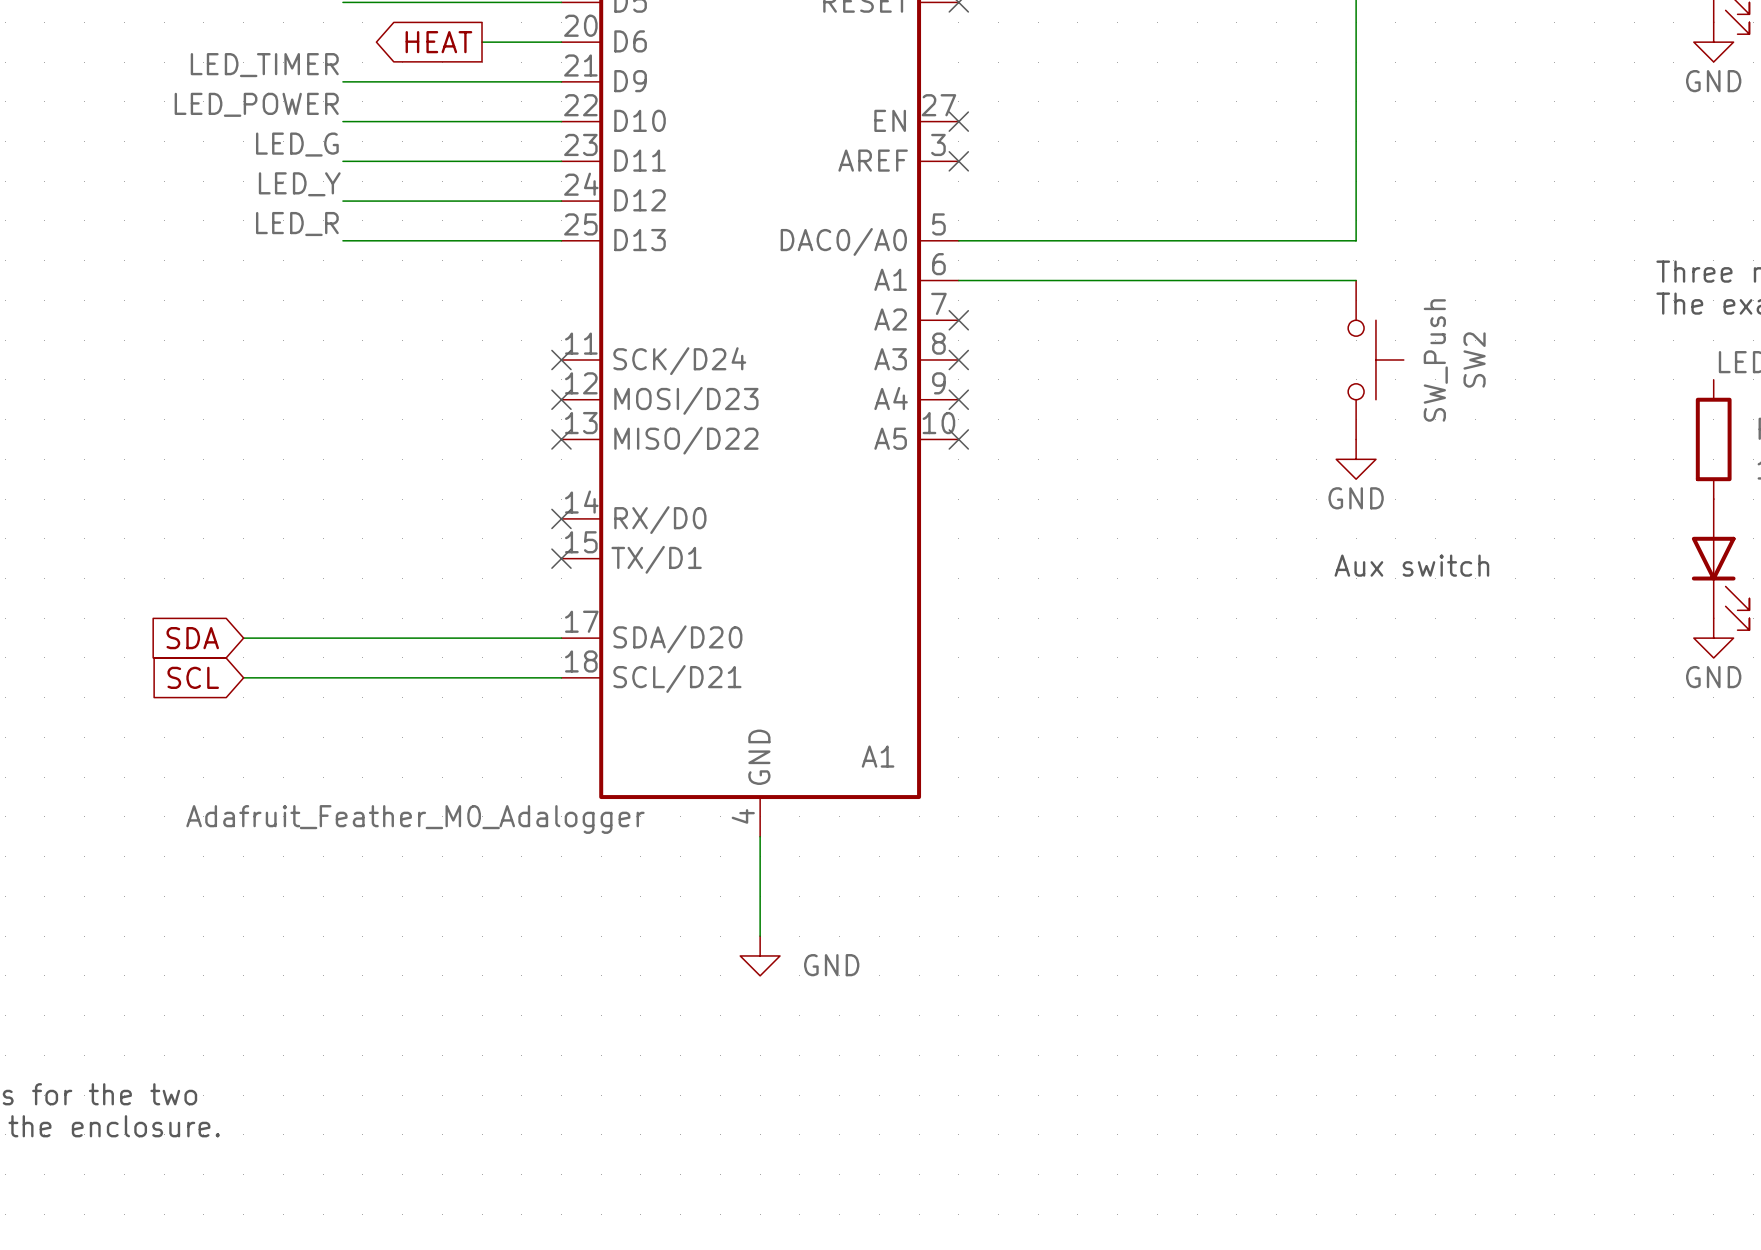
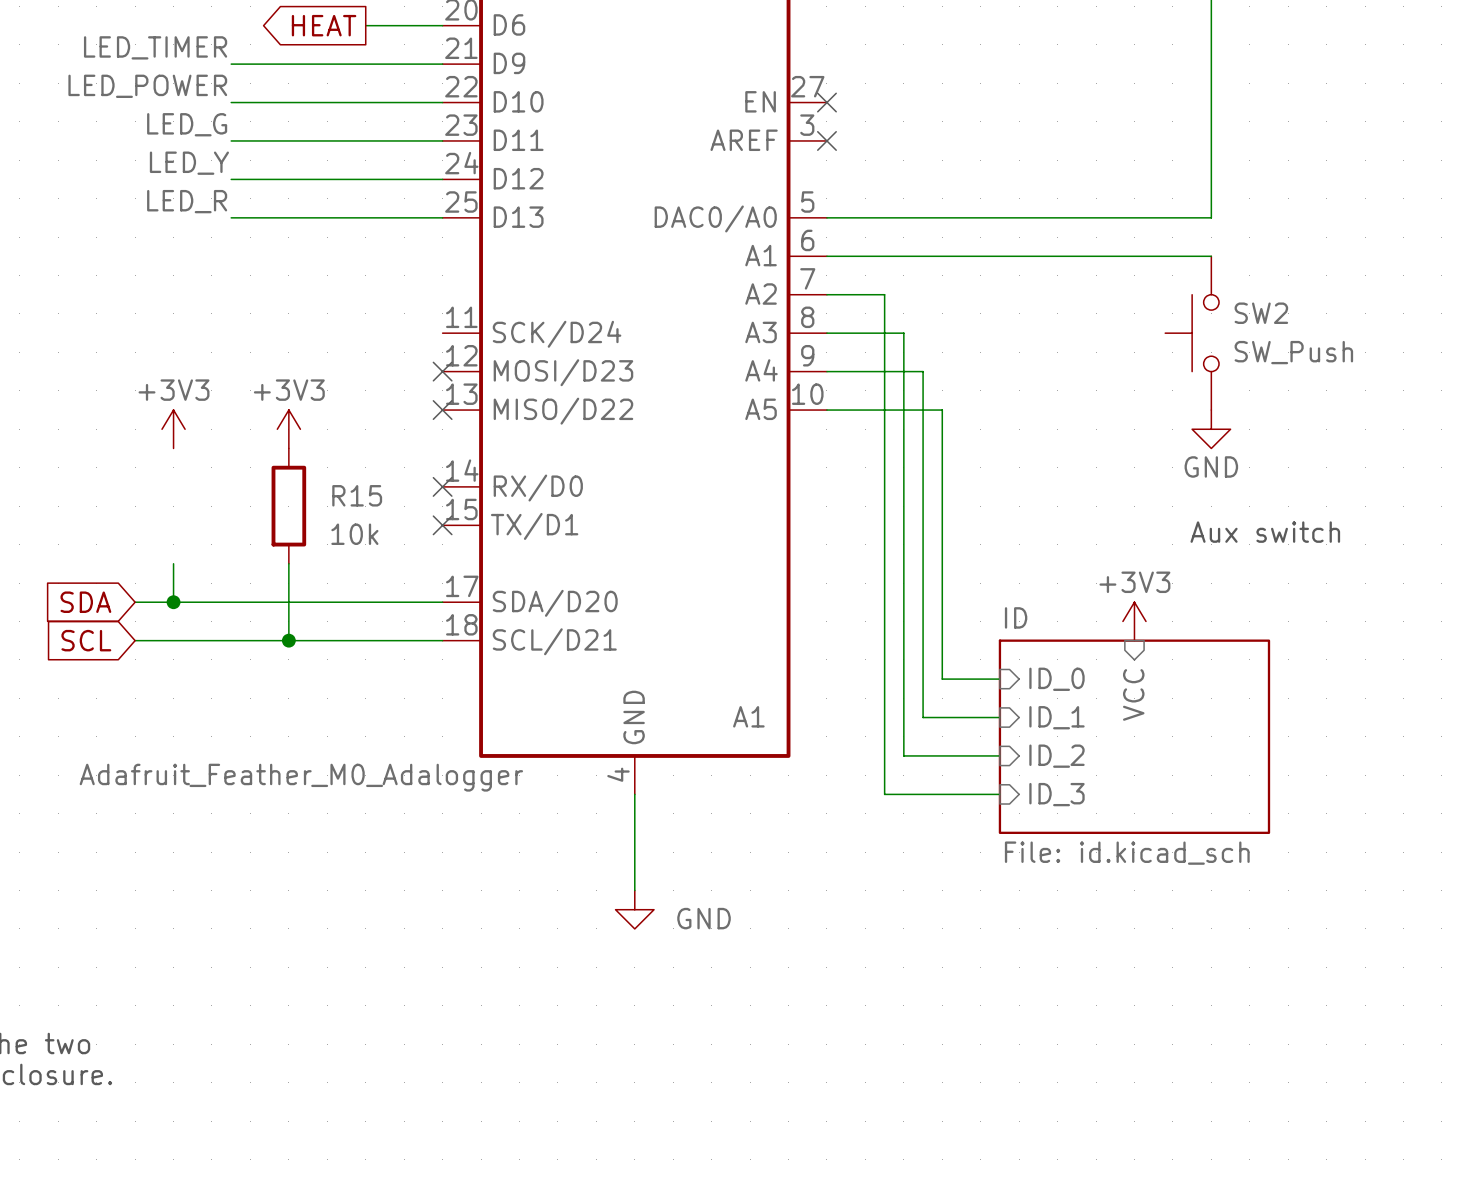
wire: none -> (826, 294) (884, 294) (884, 794) (999, 794)
no-connect mark: (958, 320) -> none
no-connect mark: (561, 359) -> none
wire: none -> (826, 333) (903, 333) (903, 755) (999, 755)
no-connect mark: (958, 359) -> none
SW2 rotation: 0° (1375, 359) -> 180° (1192, 333)
SW2 value position: SW_Push (1435, 360) -> SW_Push (1293, 352)
wire: none -> (826, 371) (923, 371) (923, 717) (999, 717)
no-connect mark: (958, 399) -> none
wire: none -> (826, 410) (942, 410) (942, 679) (999, 679)
no-connect mark: (958, 439) -> none
power symbol: none -> +3V3 (173, 429)
power symbol: none -> +3V3 (288, 429)
R15: none -> 10k (288, 506)
wire: none -> (173, 563) (173, 602)
wire: none -> (288, 563) (288, 640)
junction: none -> (173, 602)
power symbol: none -> +3V3 (1134, 621)
junction: none -> (288, 640)
sheet pin: none -> ID_0 (1056, 679)
sheet pin: none -> VCC (1133, 694)
sheet pin: none -> ID_1 (1056, 717)
sheet ID: none -> File: id.kicad_sch (1134, 736)
sheet pin: none -> ID_2 (1056, 756)
sheet pin: none -> ID_3 (1056, 794)

